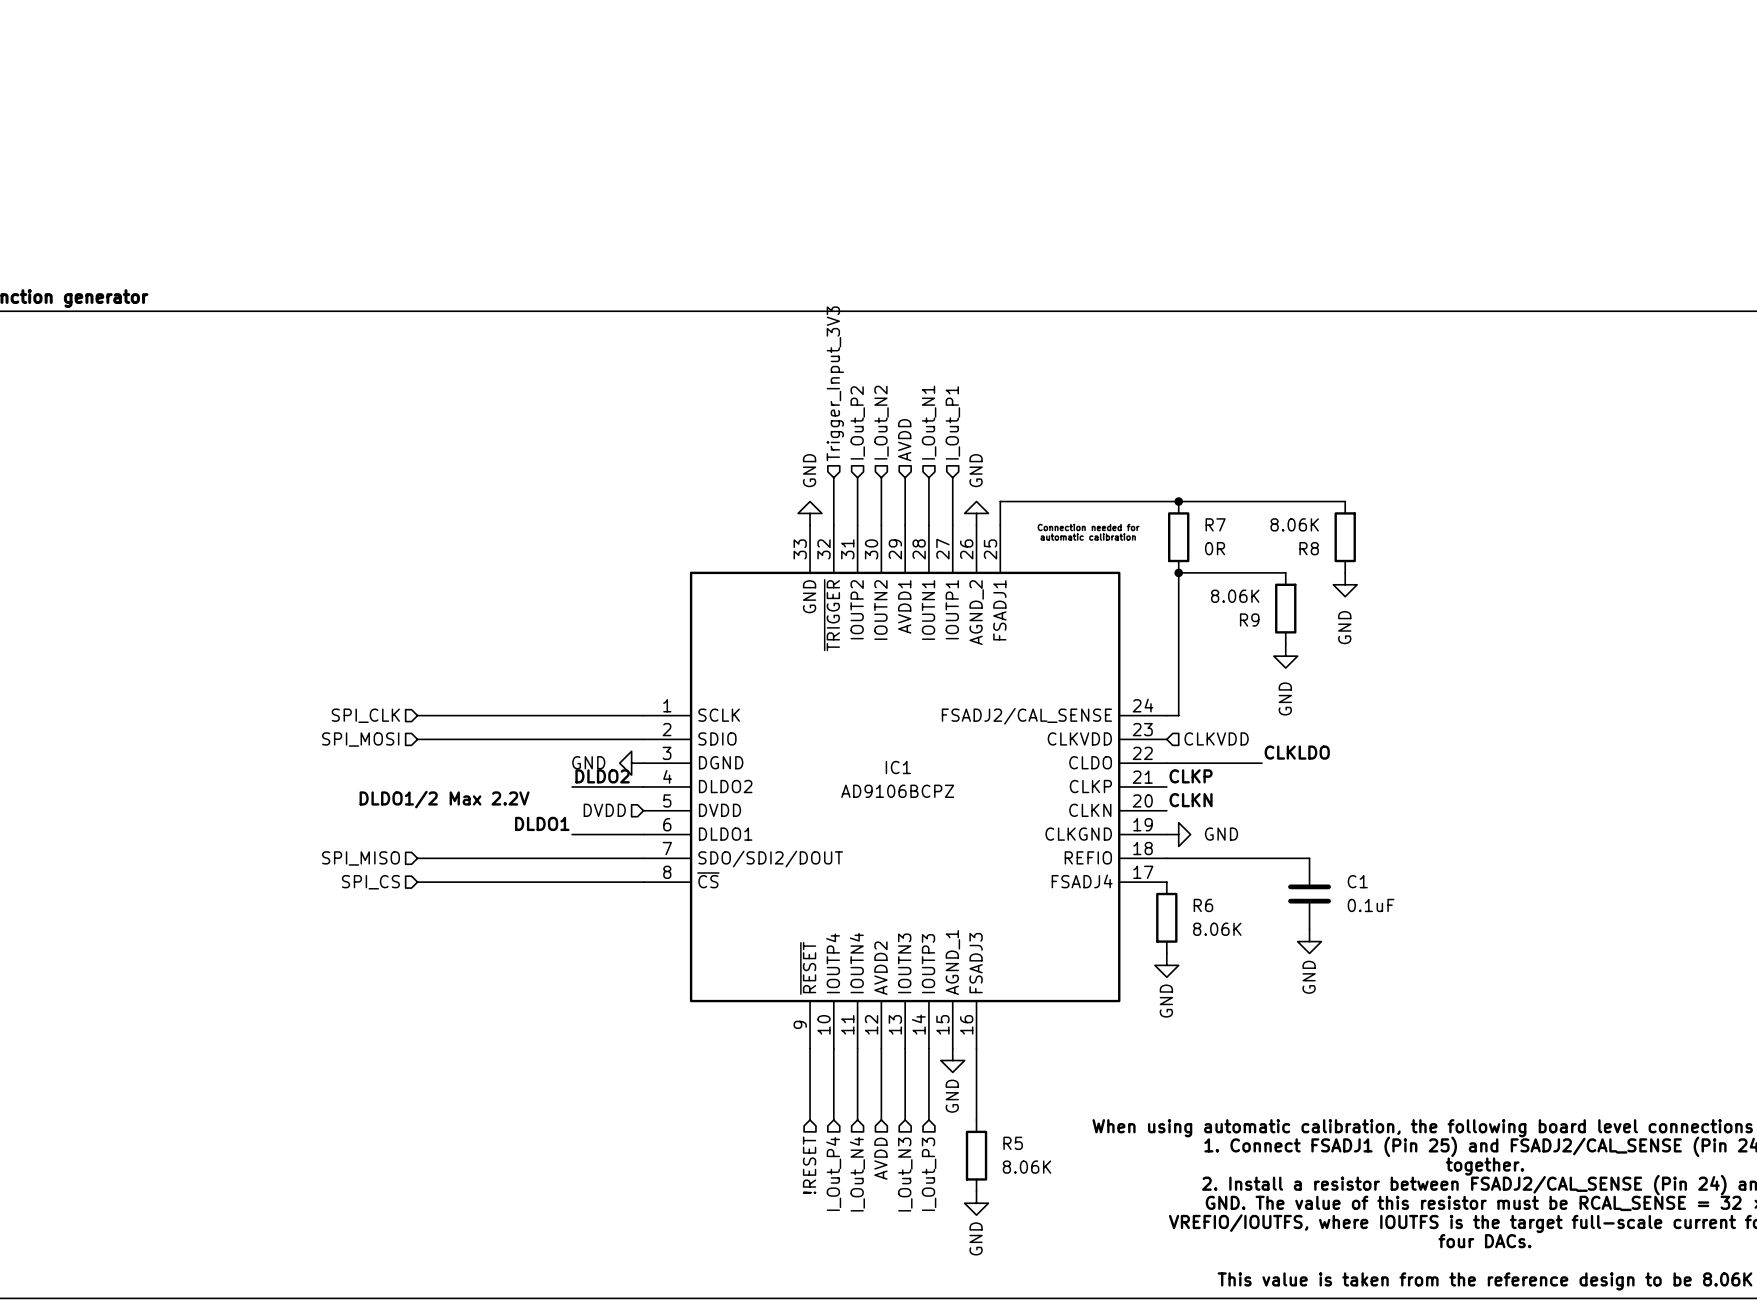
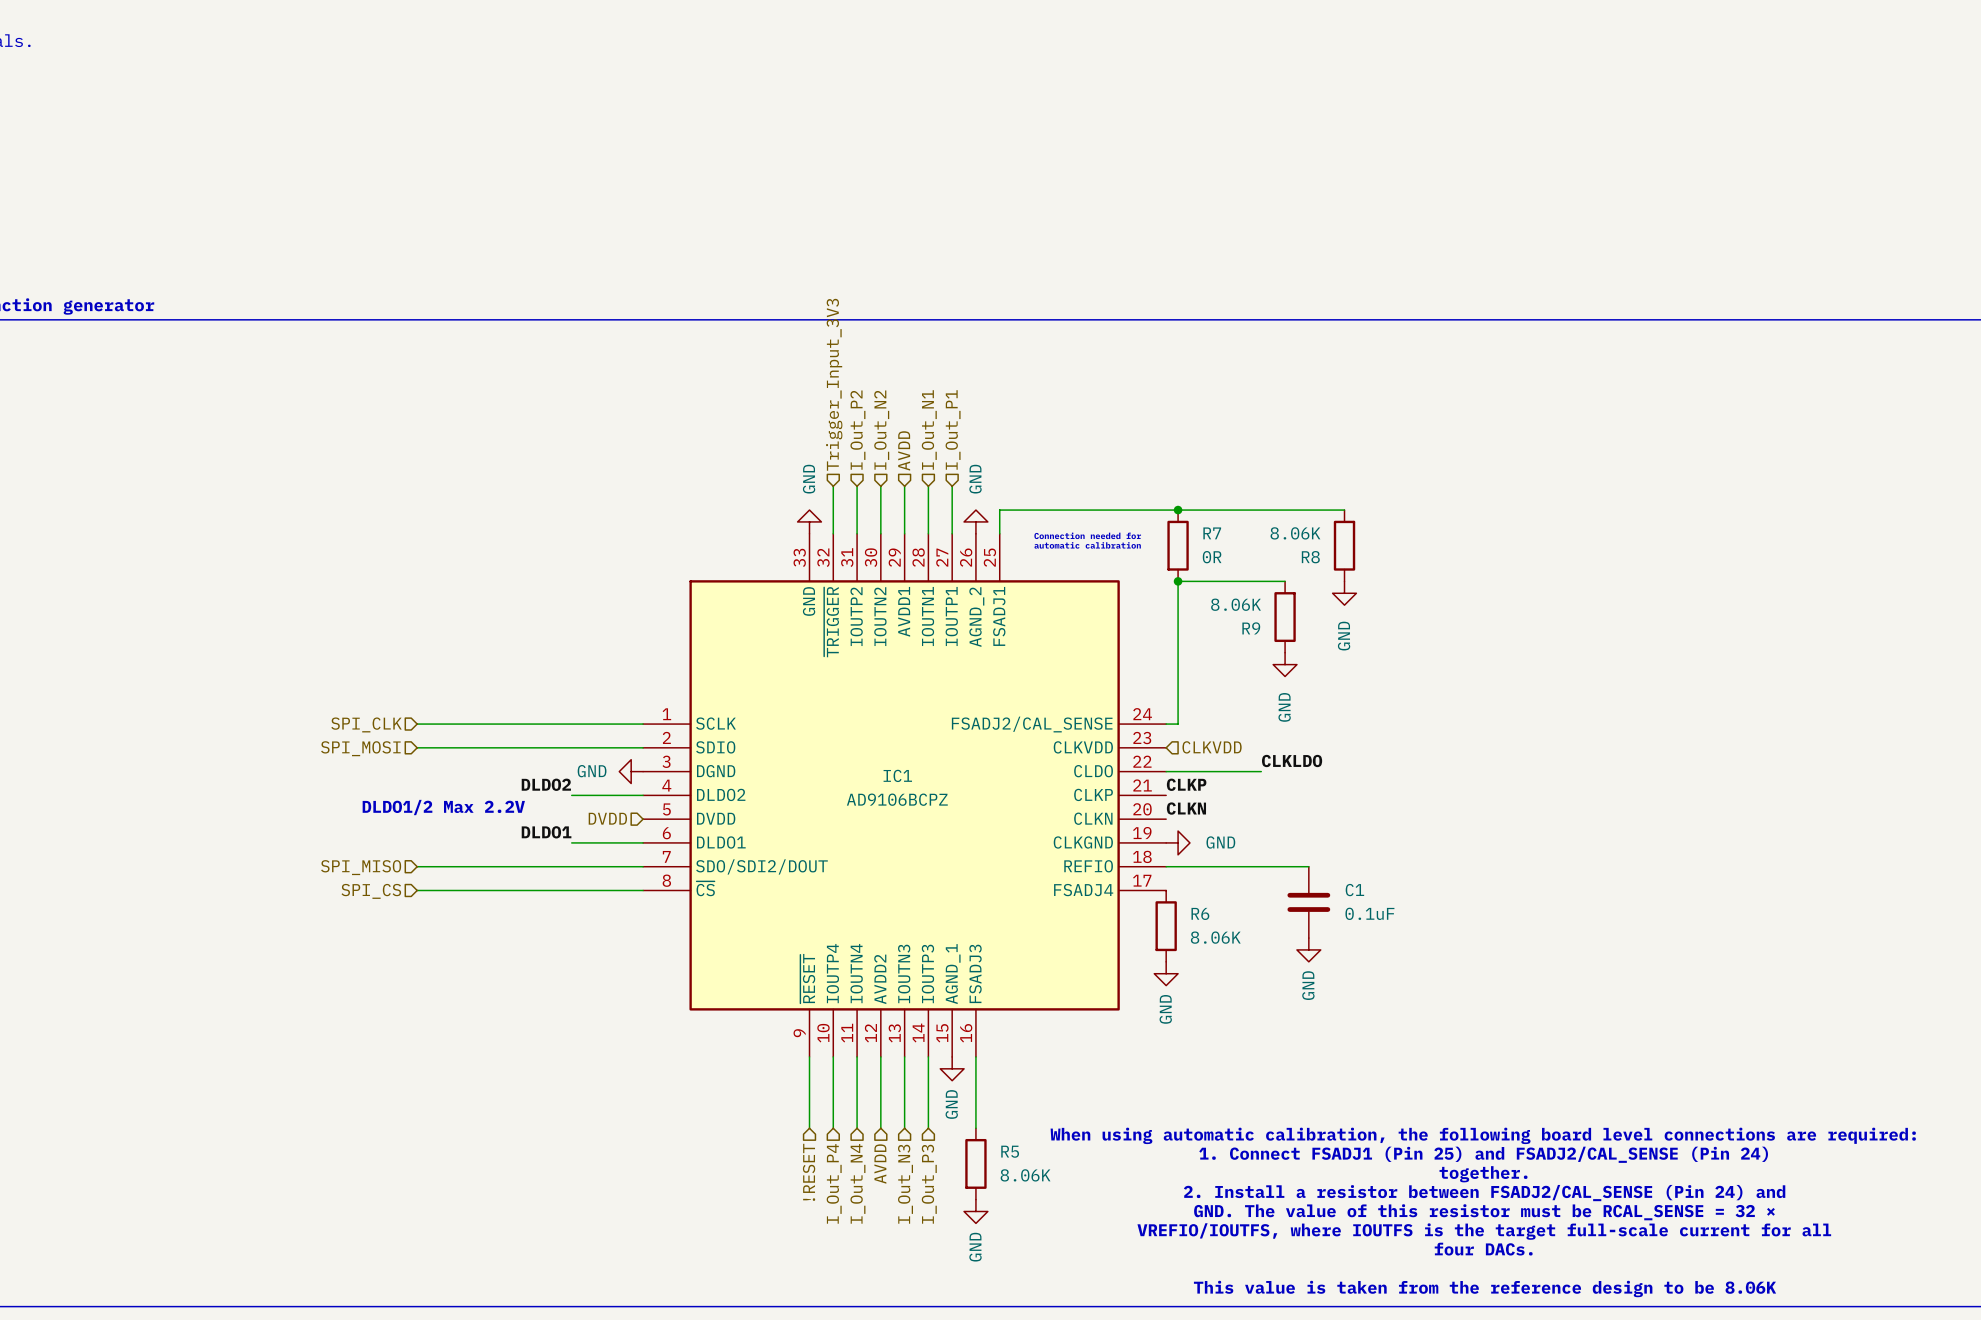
label position: DLDO2 (602, 776) -> DLDO2 (546, 784)

